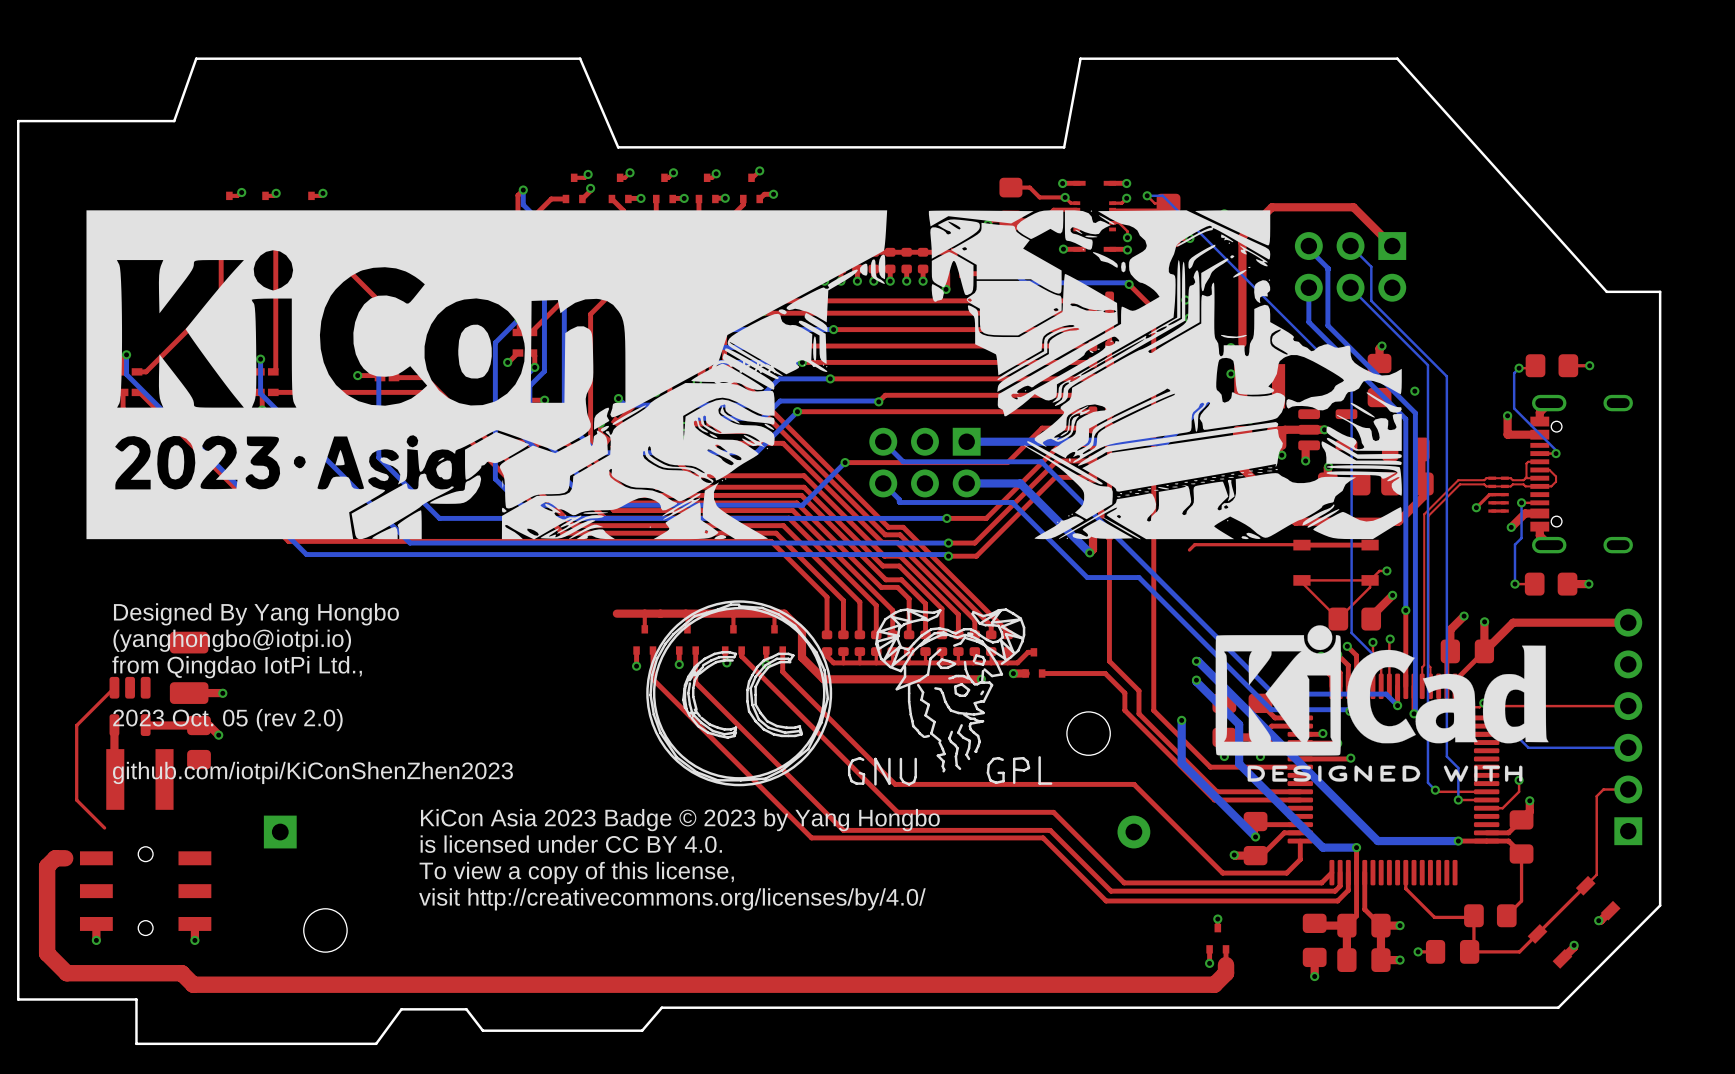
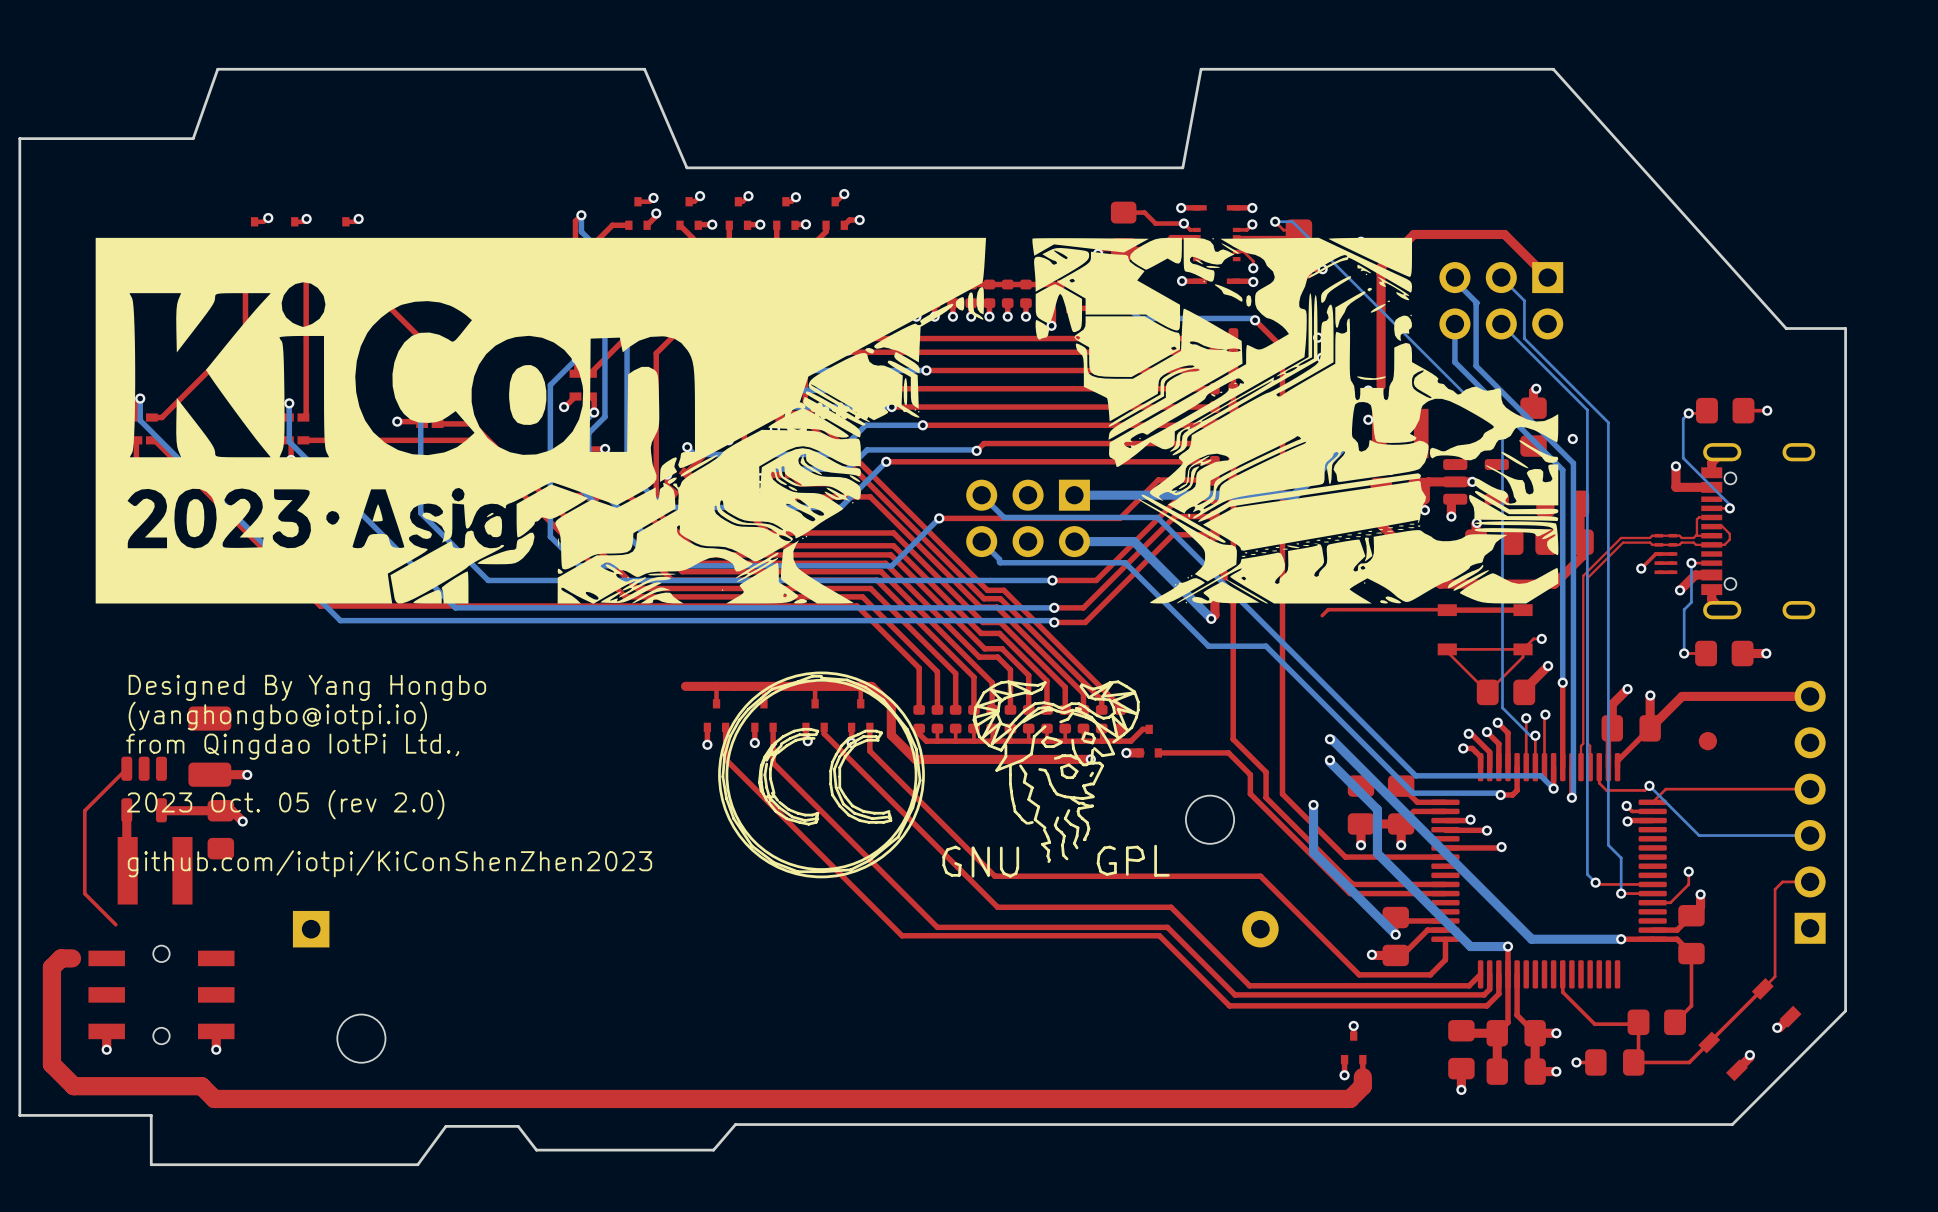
drawing: [1215, 625, 1549, 782] -> none
text: KiCon Asia 2023 Badge © 2023 by Yang Hongbo (680, 820) -> none
text: is licensed under CC BY 4.0. (571, 844) -> none
text: To view a copy of this license, (576, 872) -> none
text: visit http://creativecommons.org/licenses/by/4.0/ (672, 899) -> none

